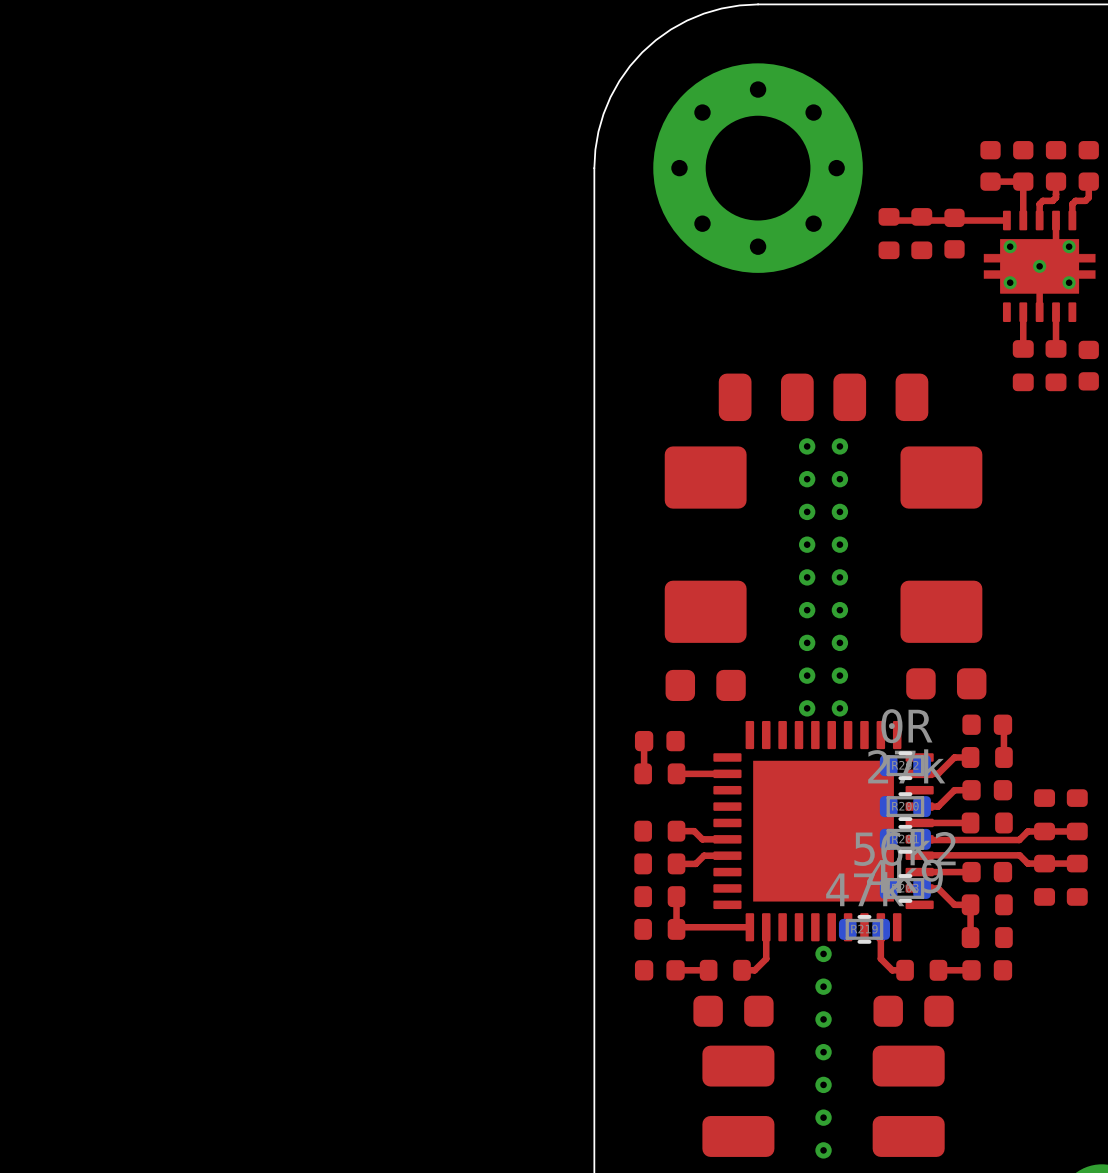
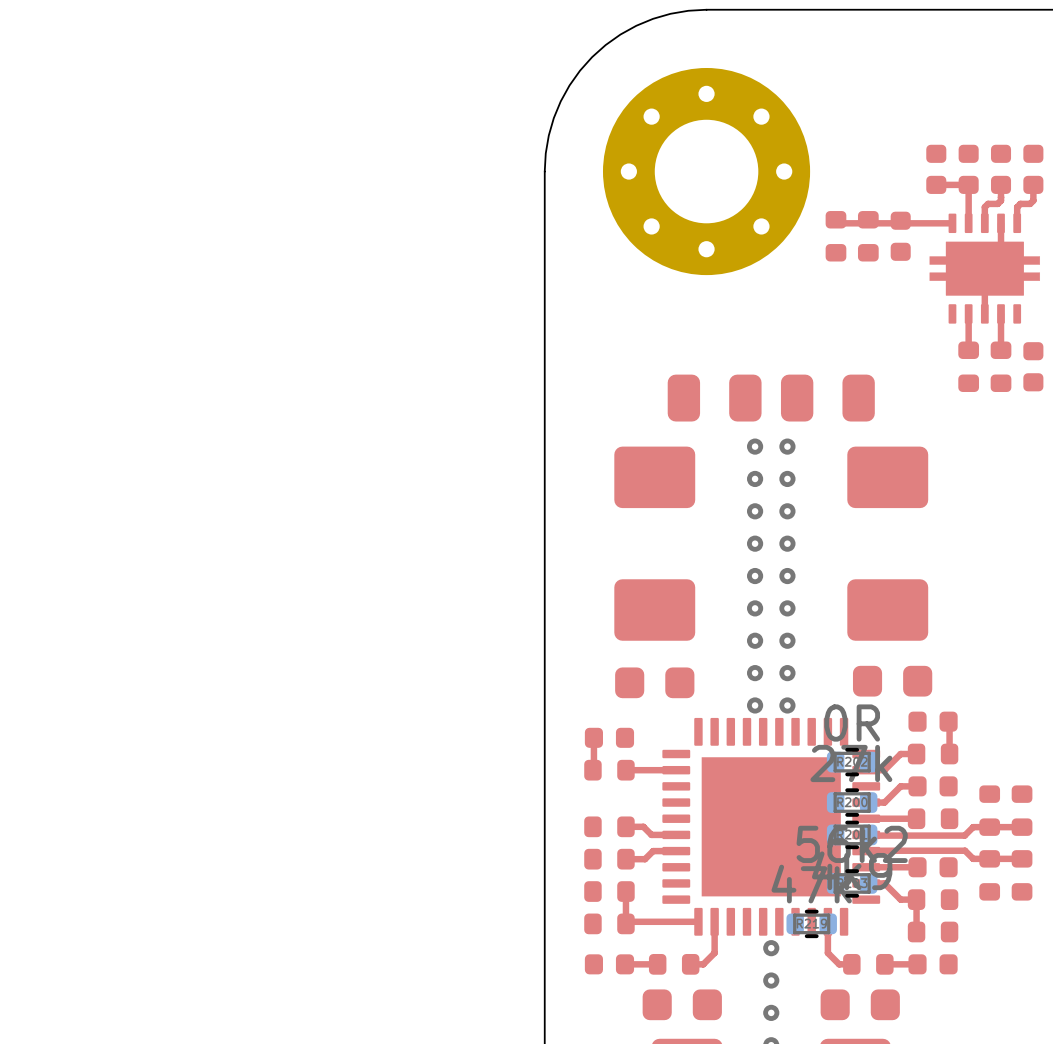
via: (1010, 246) -> none
via: (1069, 246) -> none
via: (1039, 266) -> none
via: (1010, 282) -> none
via: (1069, 282) -> none

